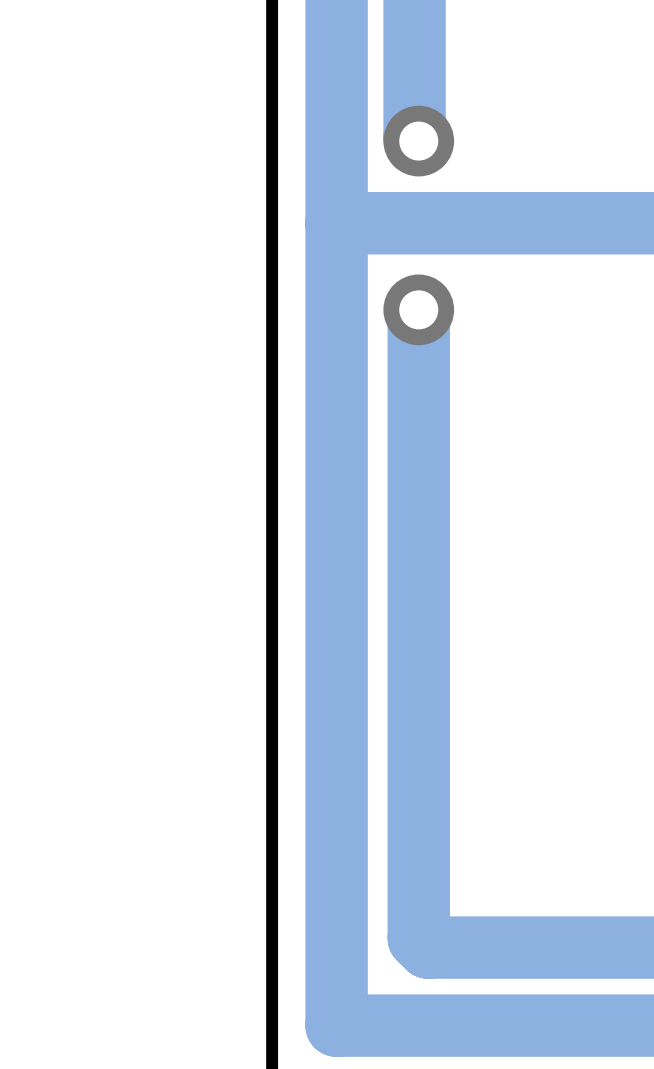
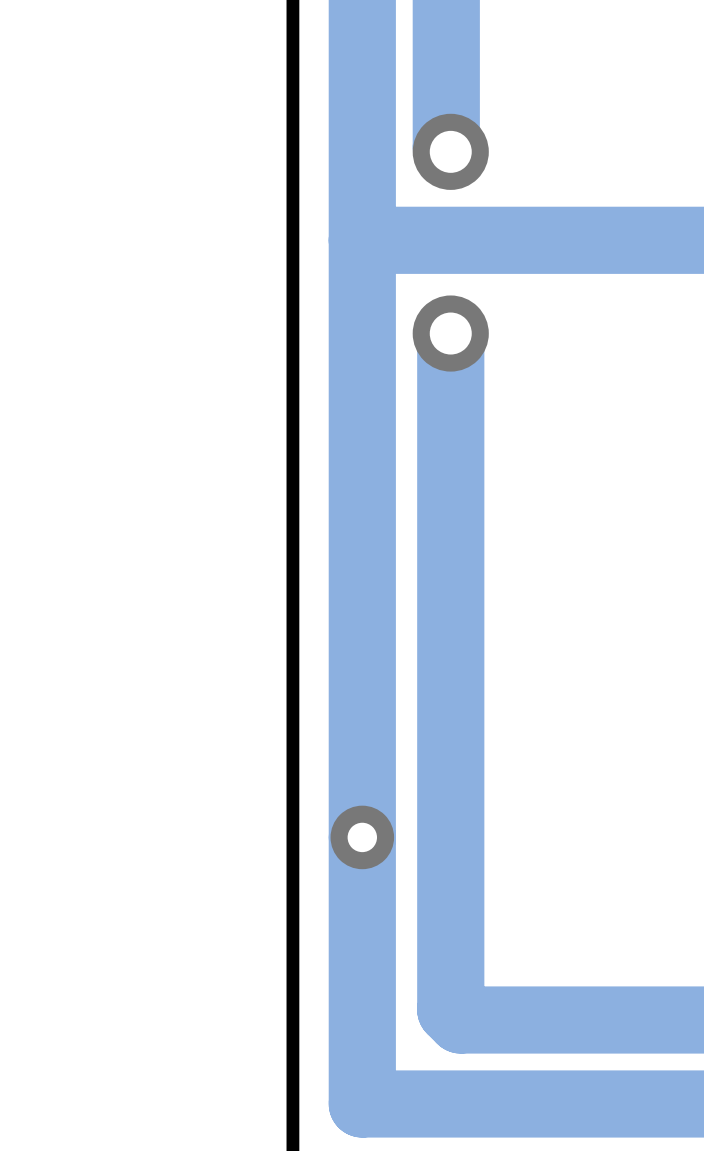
via: none -> (362, 837)

